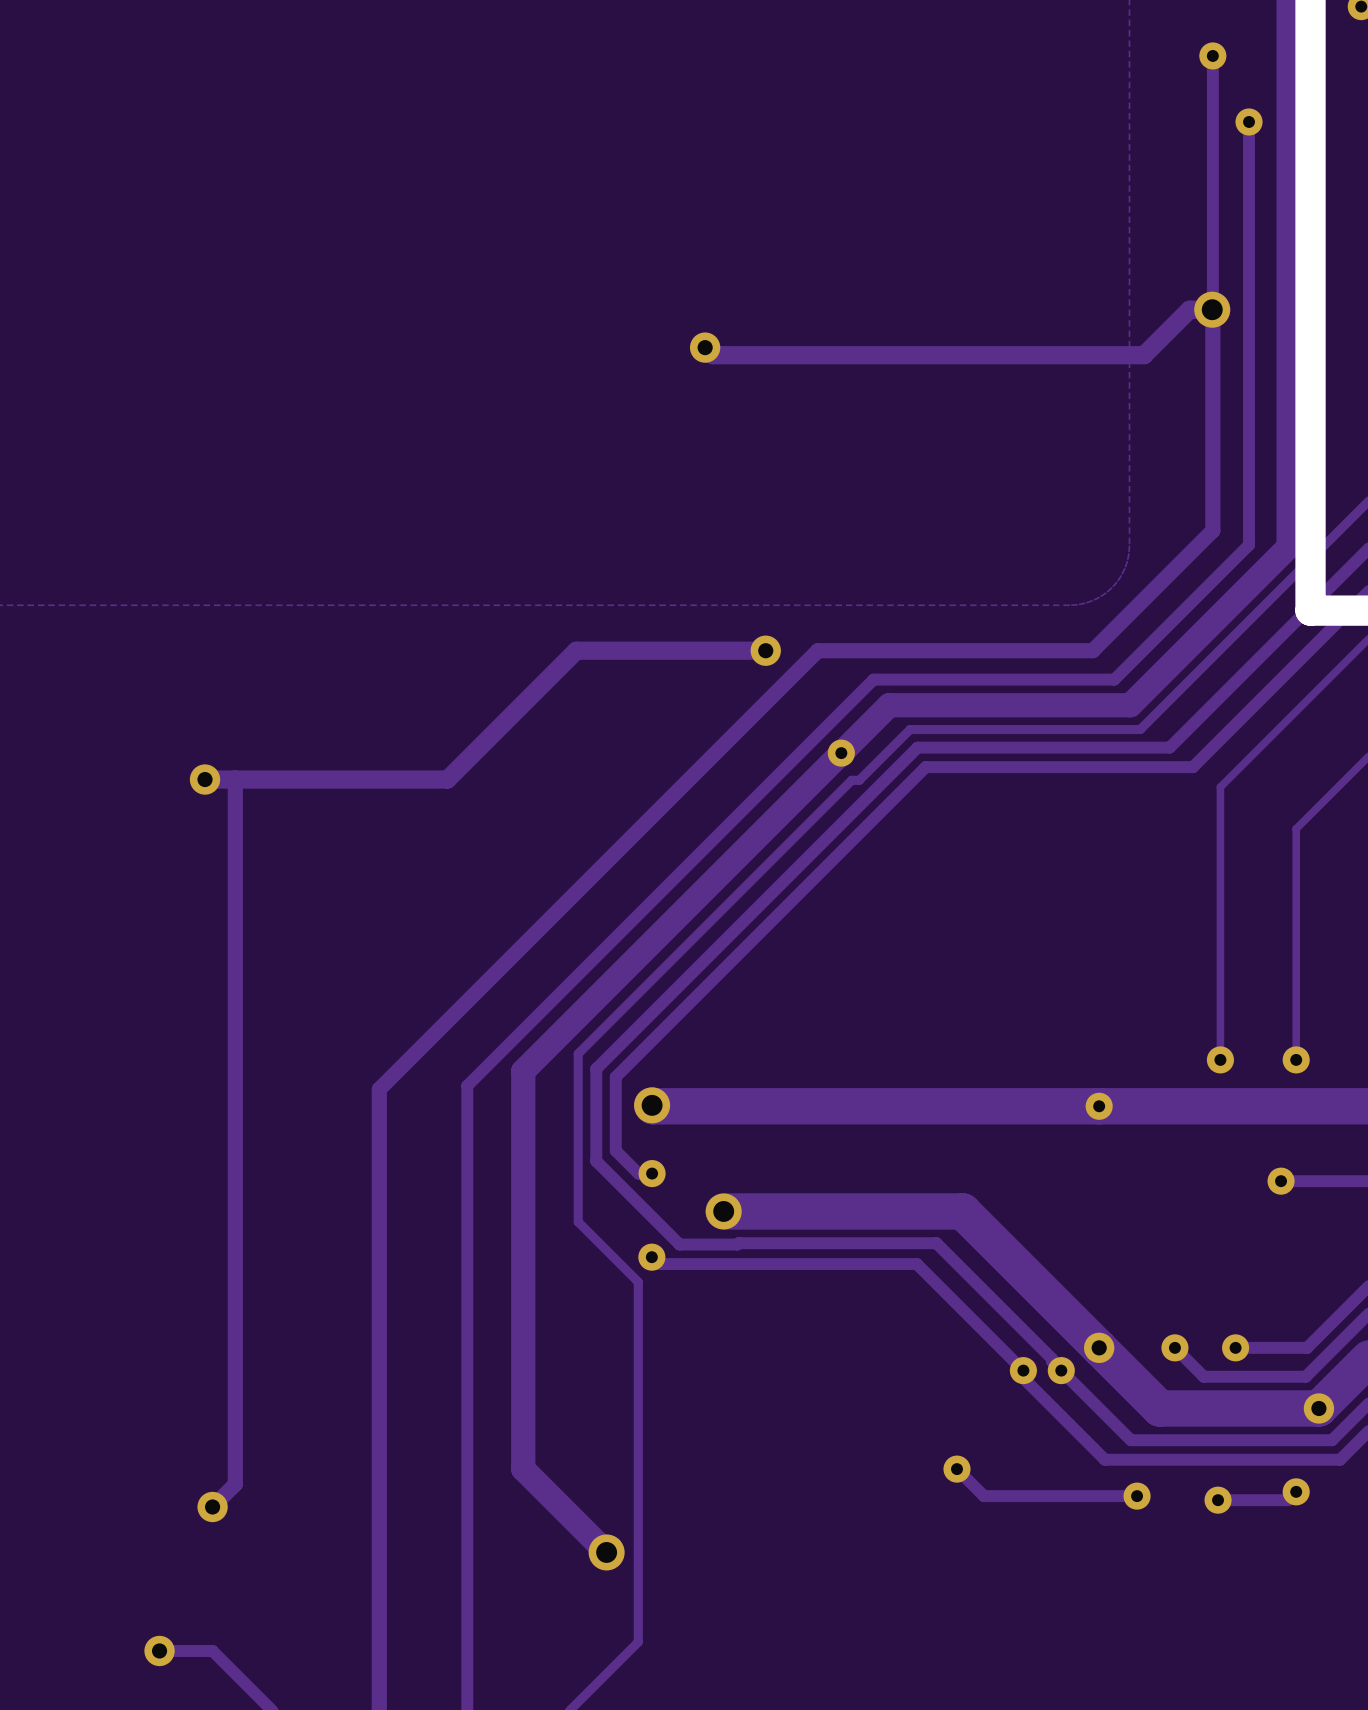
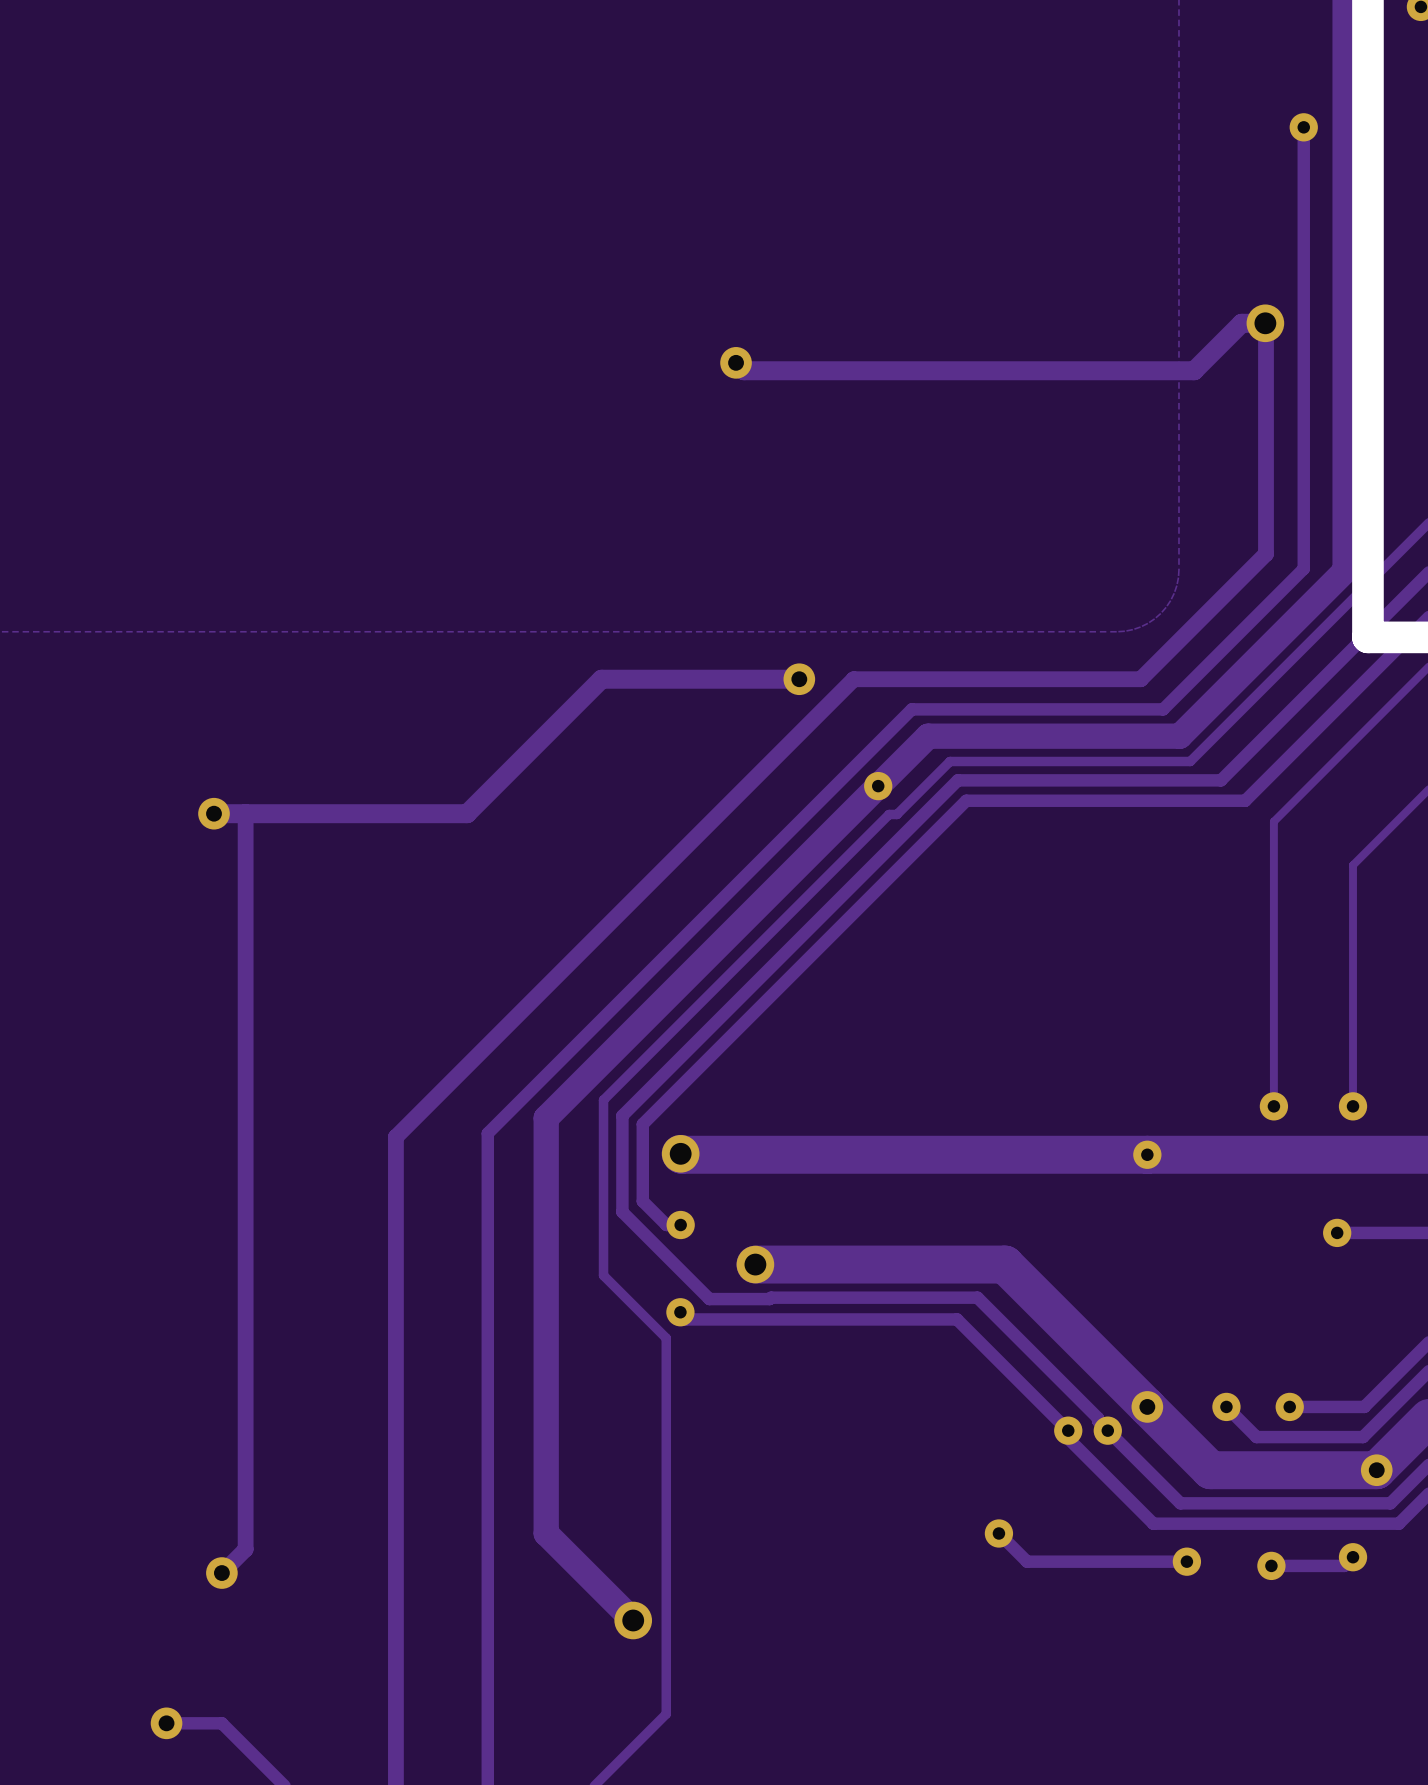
track: (1212, 55) (1212, 310) -> none
via: (1212, 55) -> none

